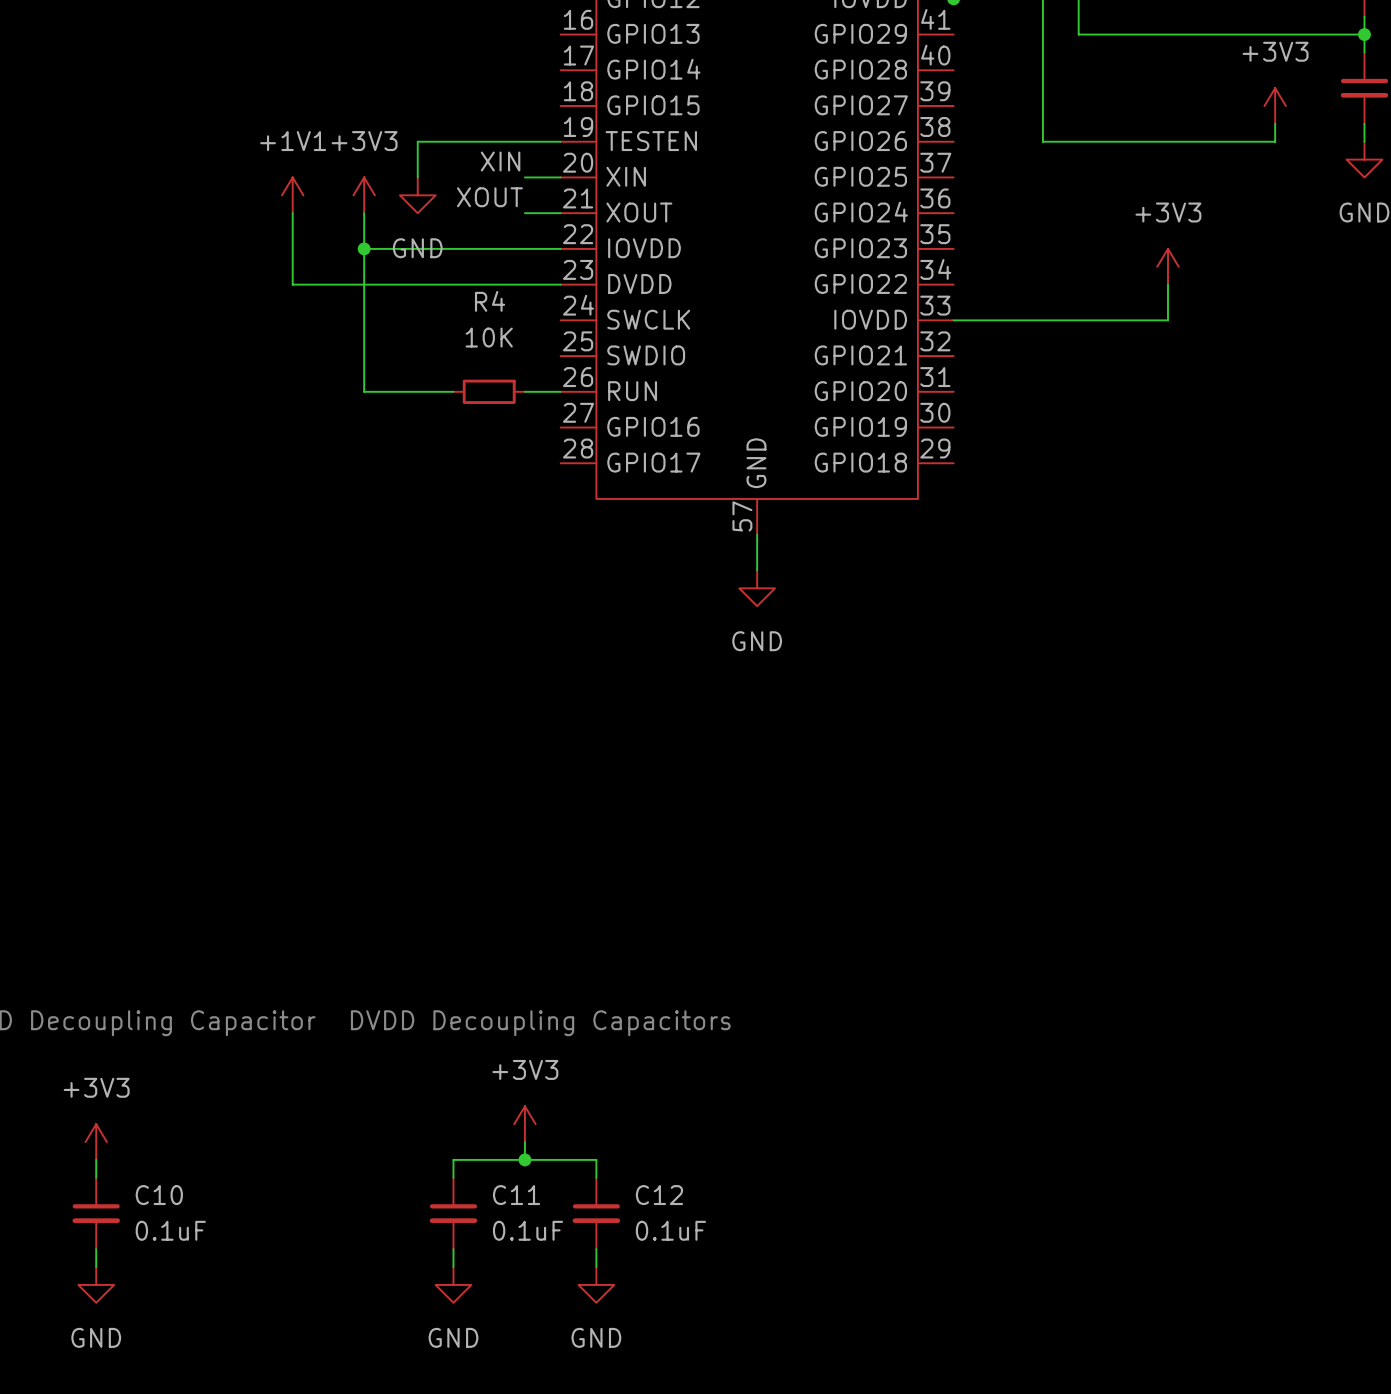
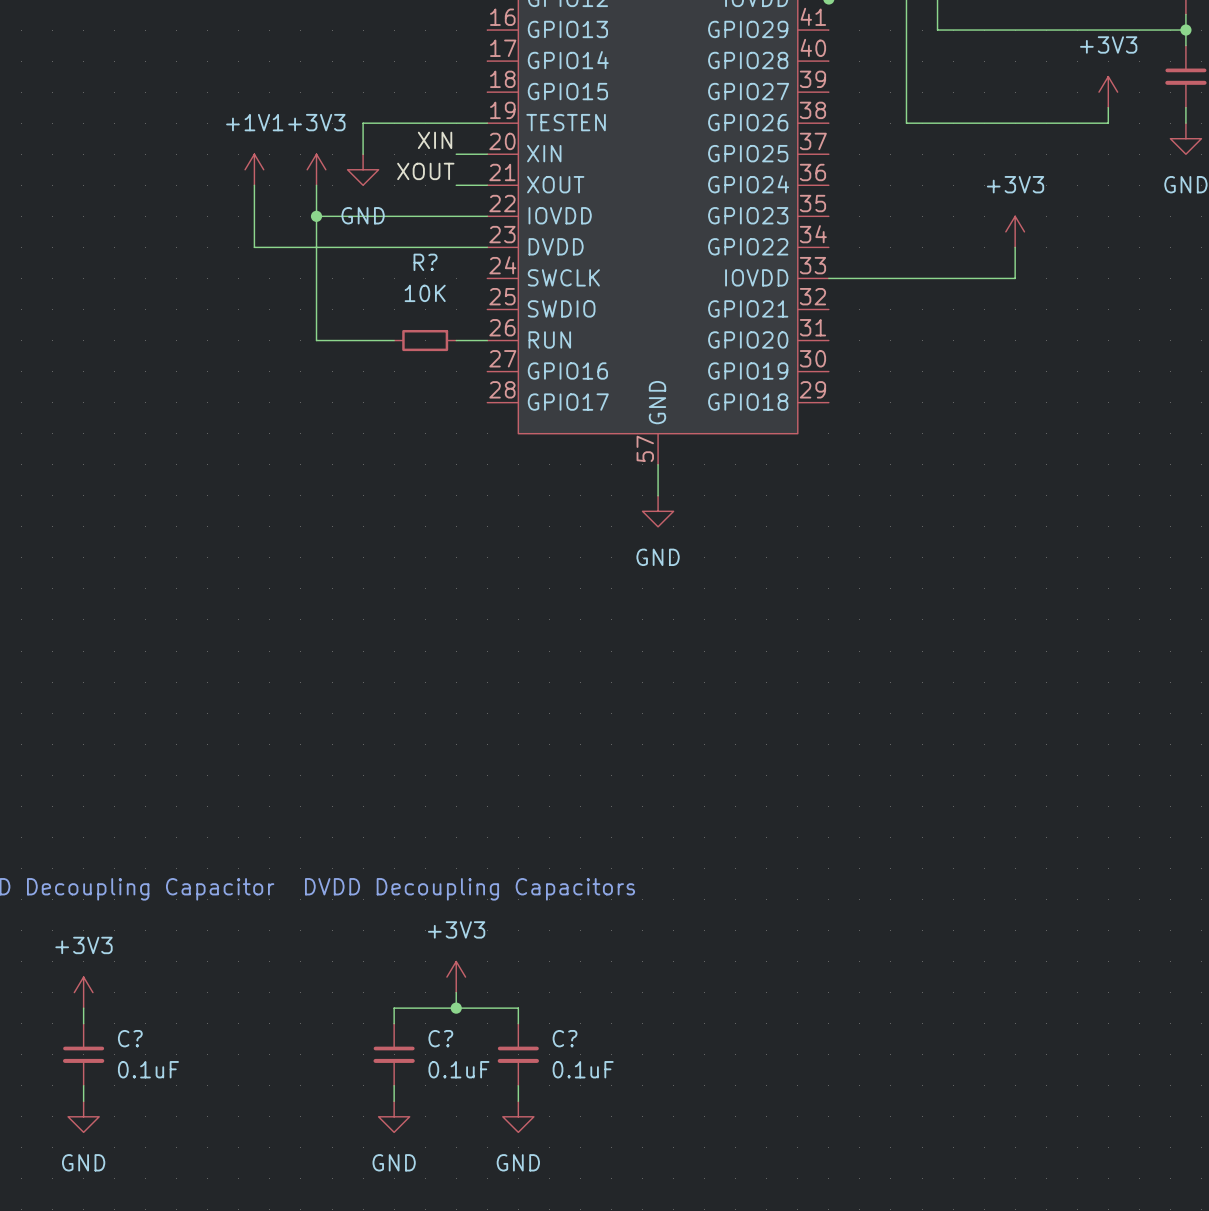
R4 name: R4 (490, 301) -> R? (425, 262)
C10 name: C10 (159, 1195) -> C? (130, 1038)
C11 name: C11 (516, 1195) -> C? (440, 1038)
C12 name: C12 (659, 1195) -> C? (565, 1038)

